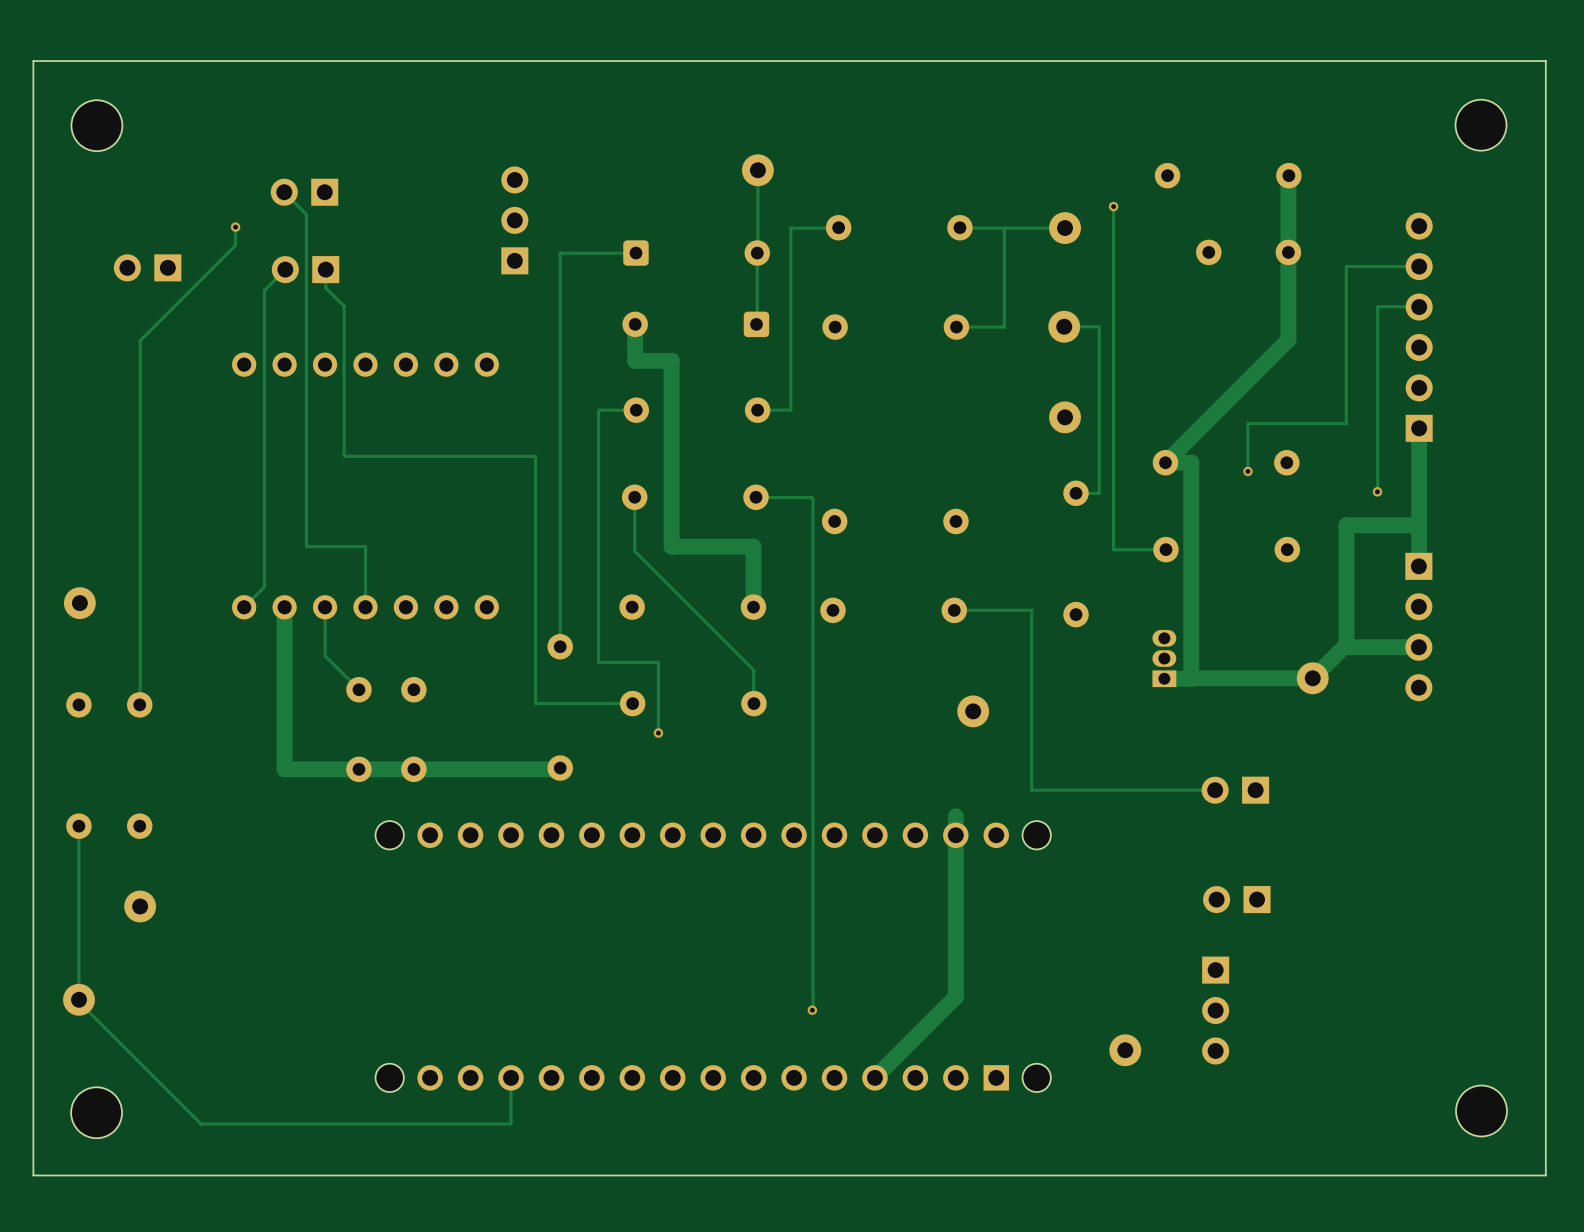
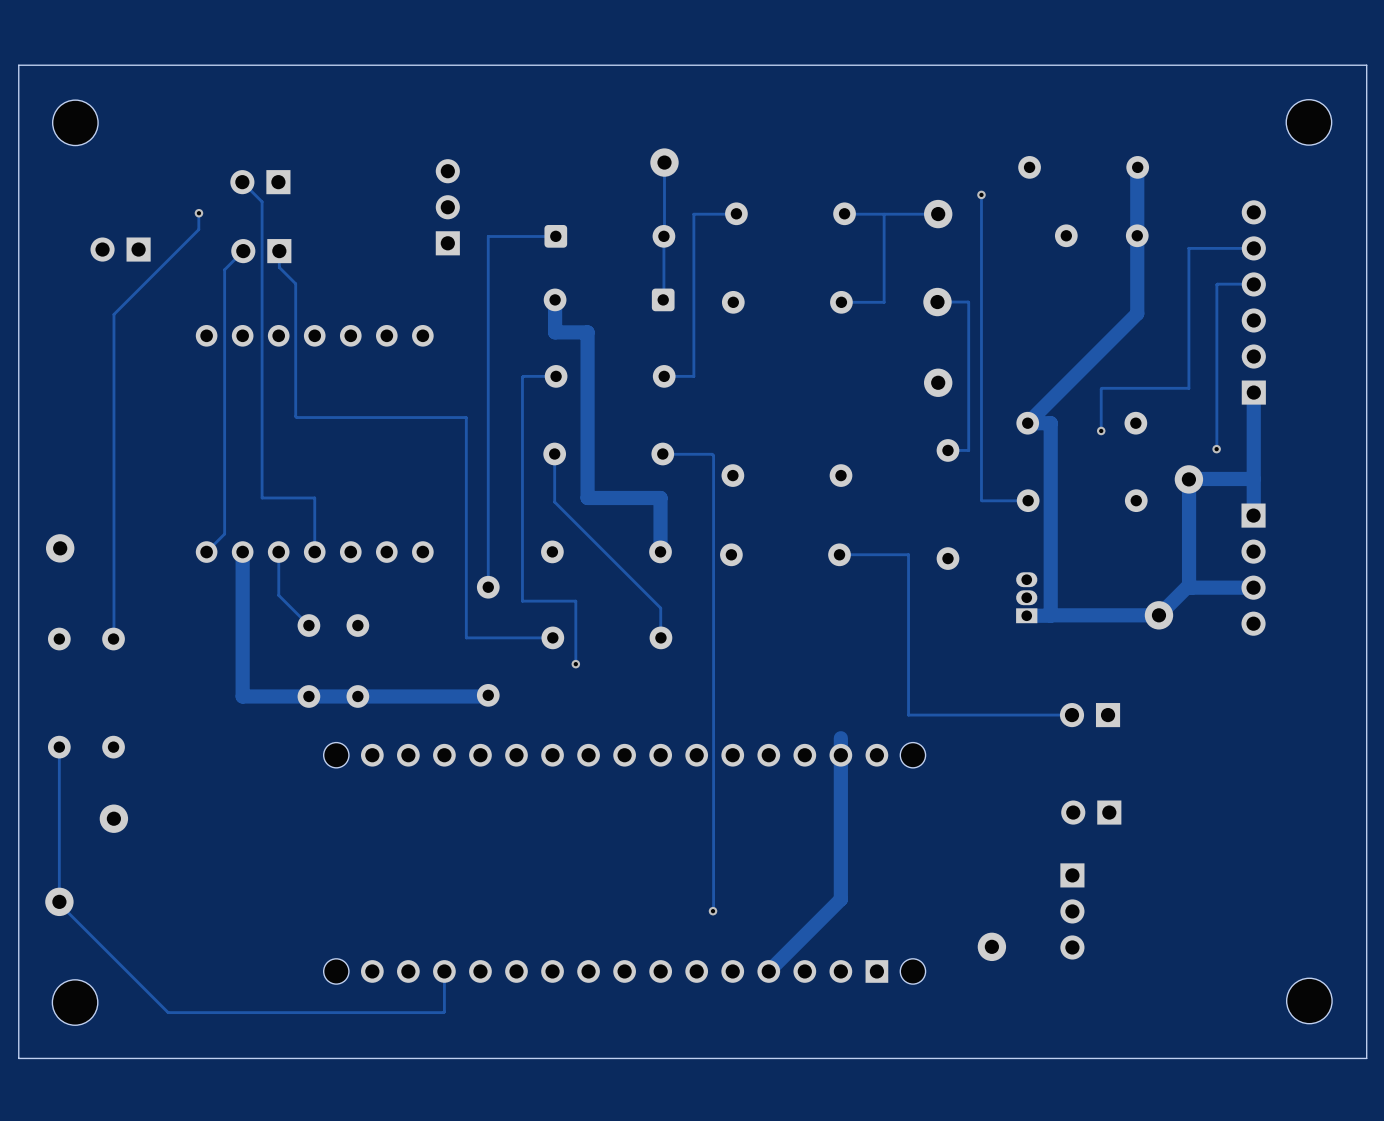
part: none -> (1188, 479)
part: (973, 711) -> none

